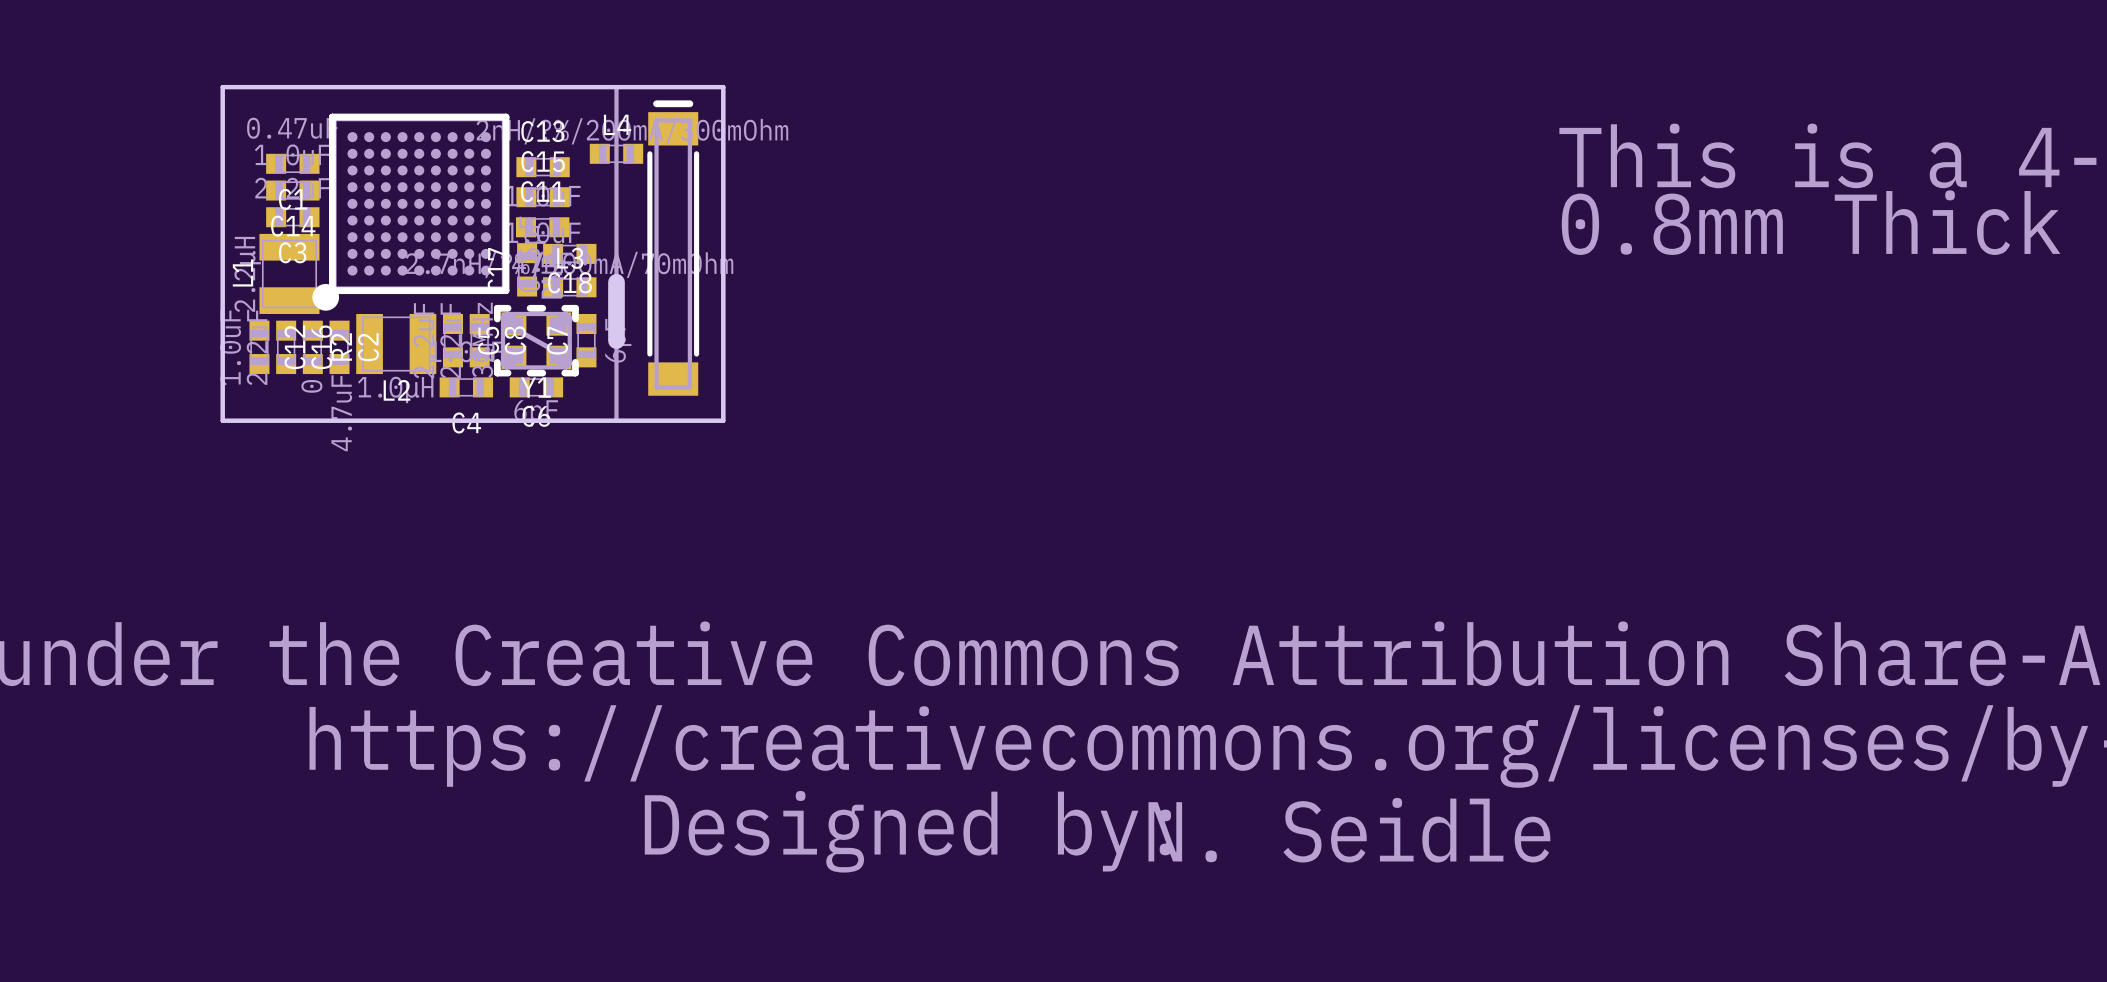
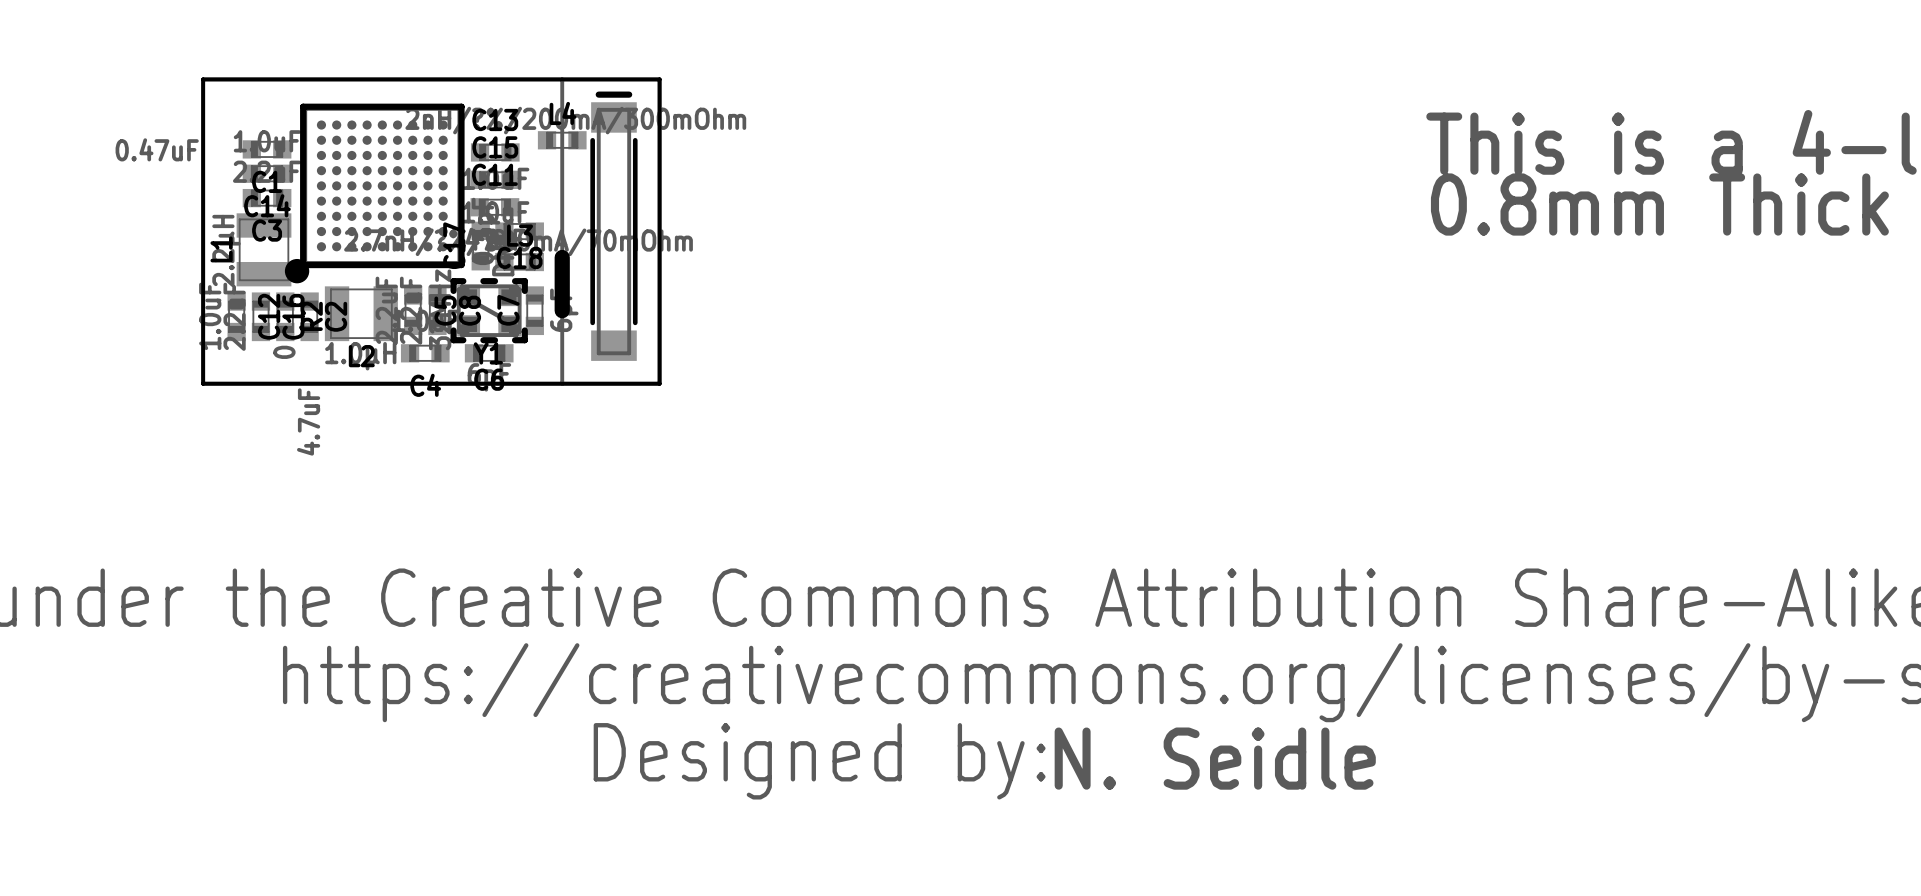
C1 value position: 0.47uF (292, 128) -> 0.47uF (157, 149)
C2 value position: 4.7uF (341, 413) -> 4.7uF (308, 421)

